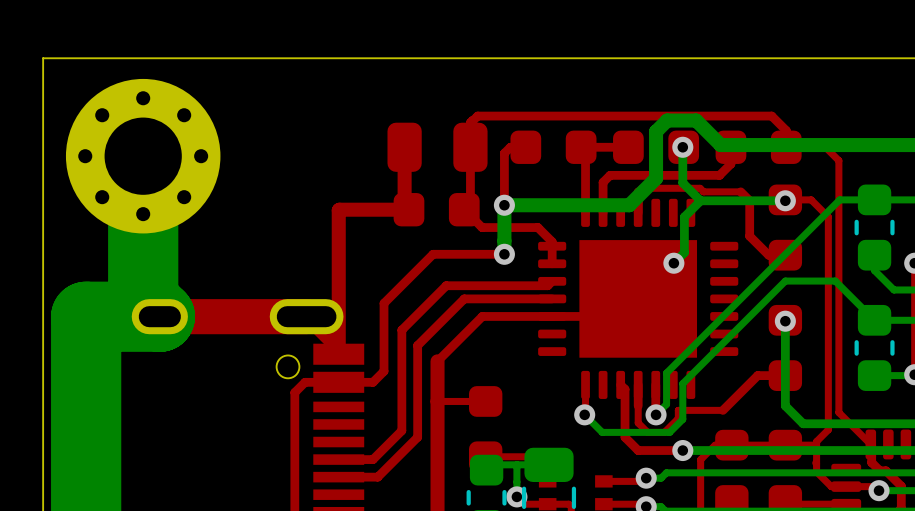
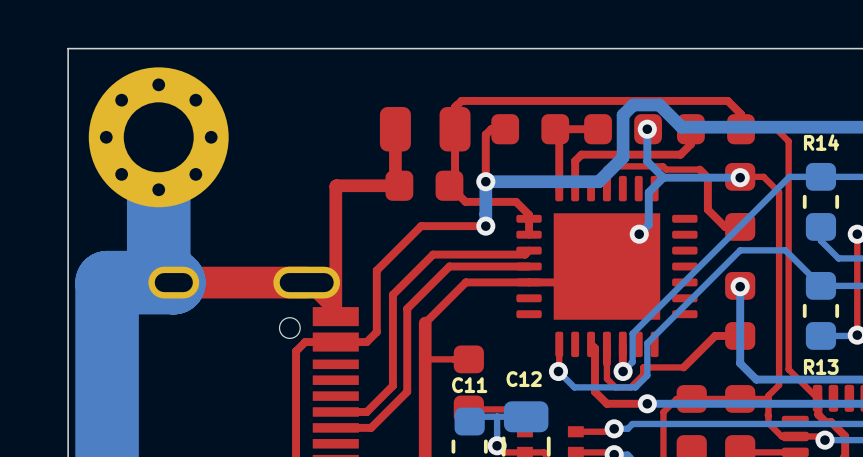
R14 name: none -> R14 (821, 142)
R13 name: none -> R13 (821, 366)
C12 name: none -> C12 (524, 379)
C11 name: none -> C11 (469, 385)

